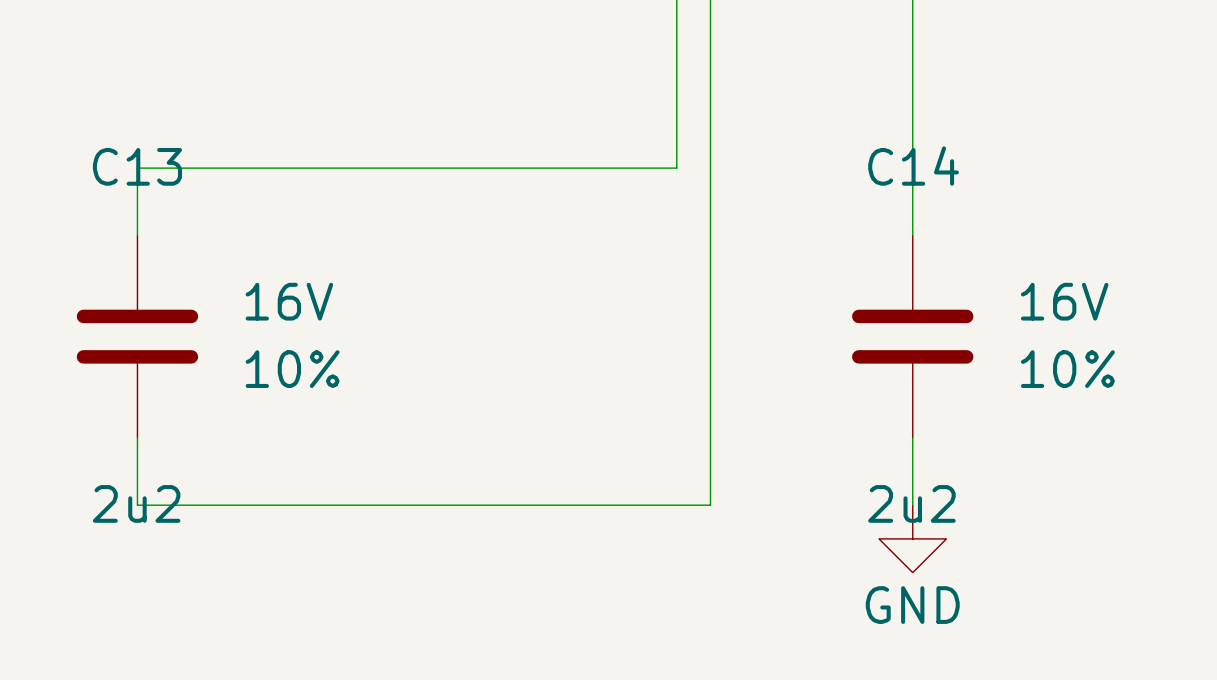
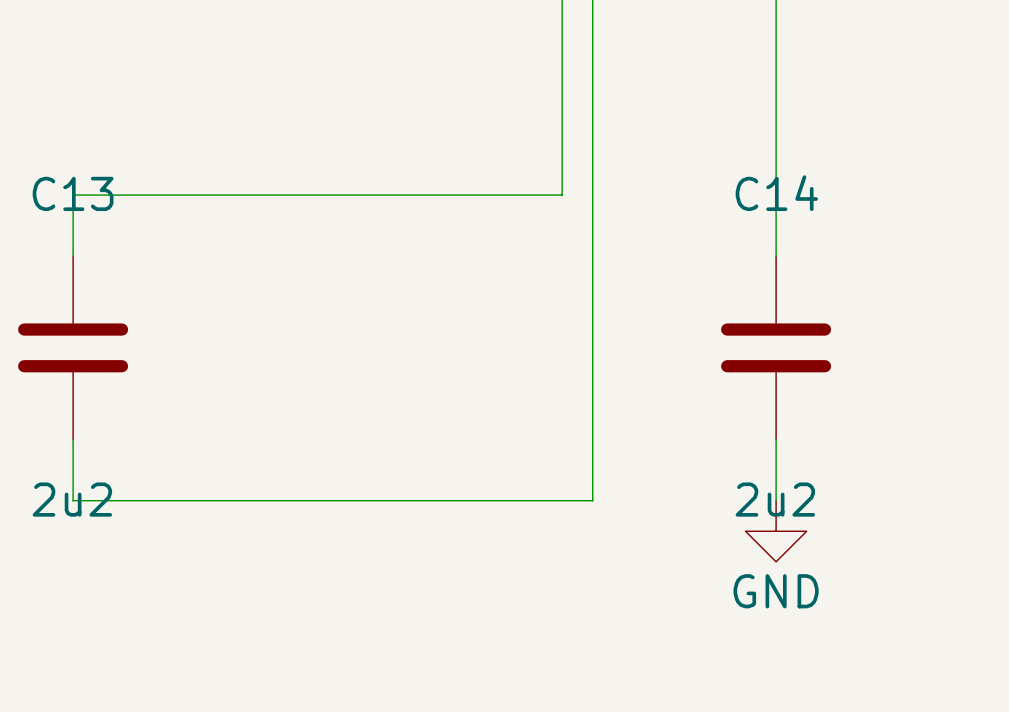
C13 text: 16V (289, 301) -> none
C14 text: 16V (1064, 301) -> none
C13 text: 10% (292, 369) -> none
C14 text: 10% (1067, 369) -> none

